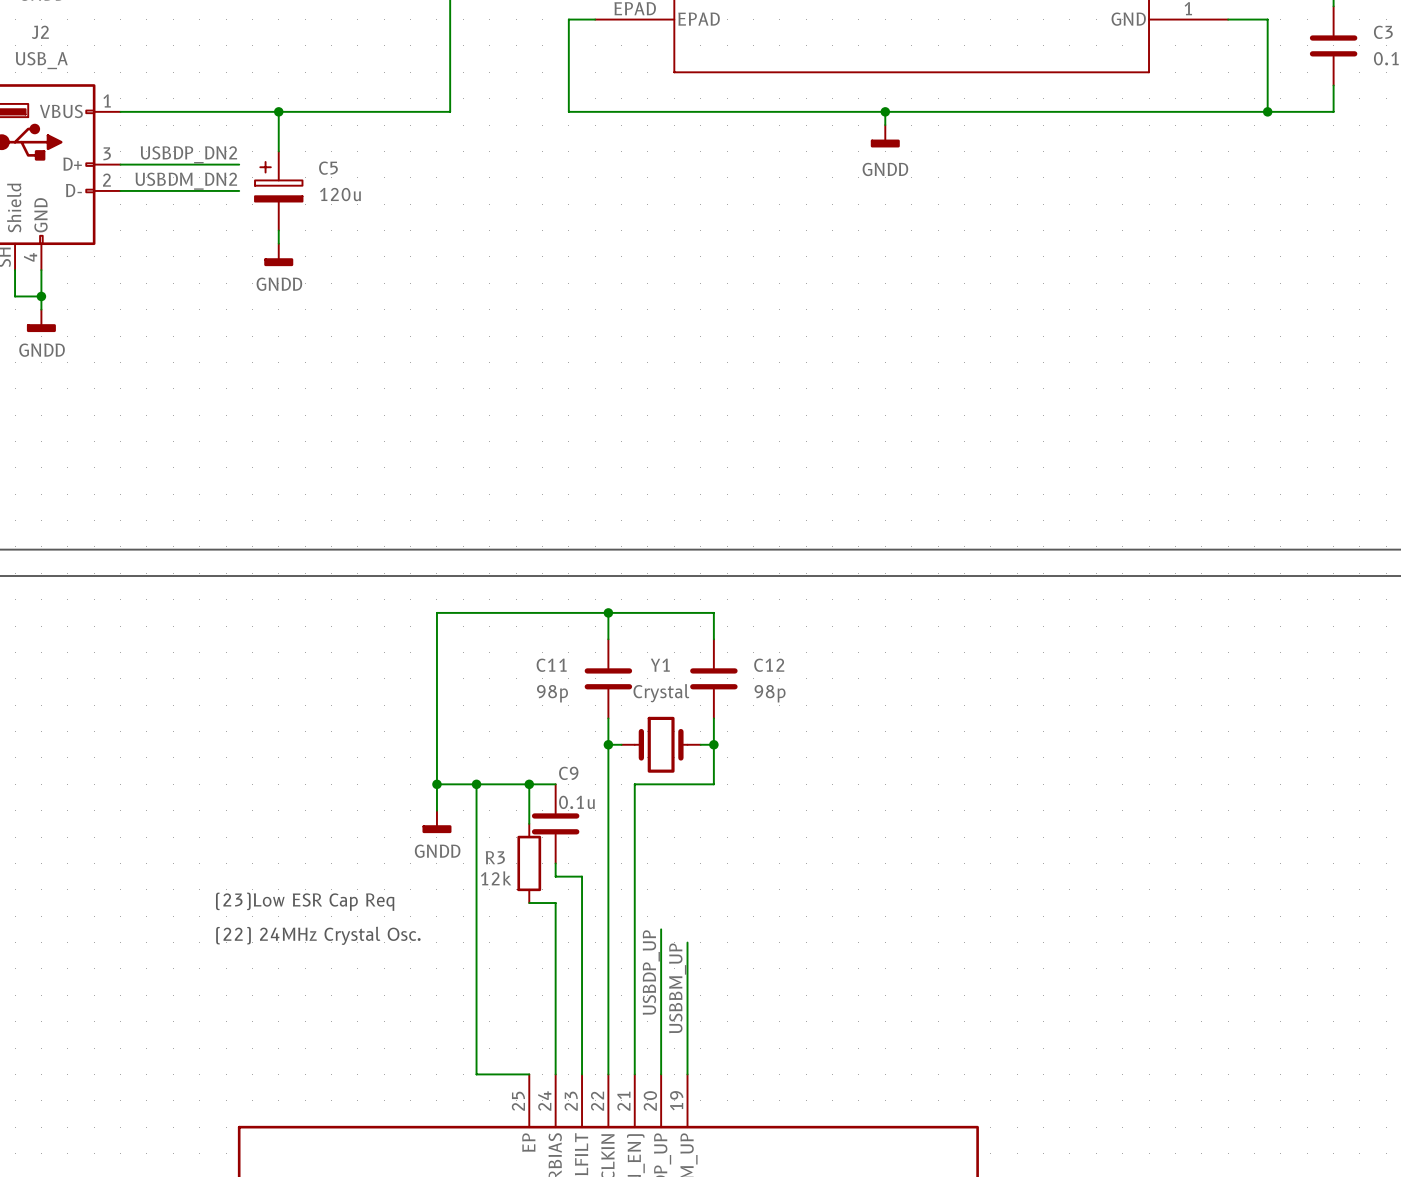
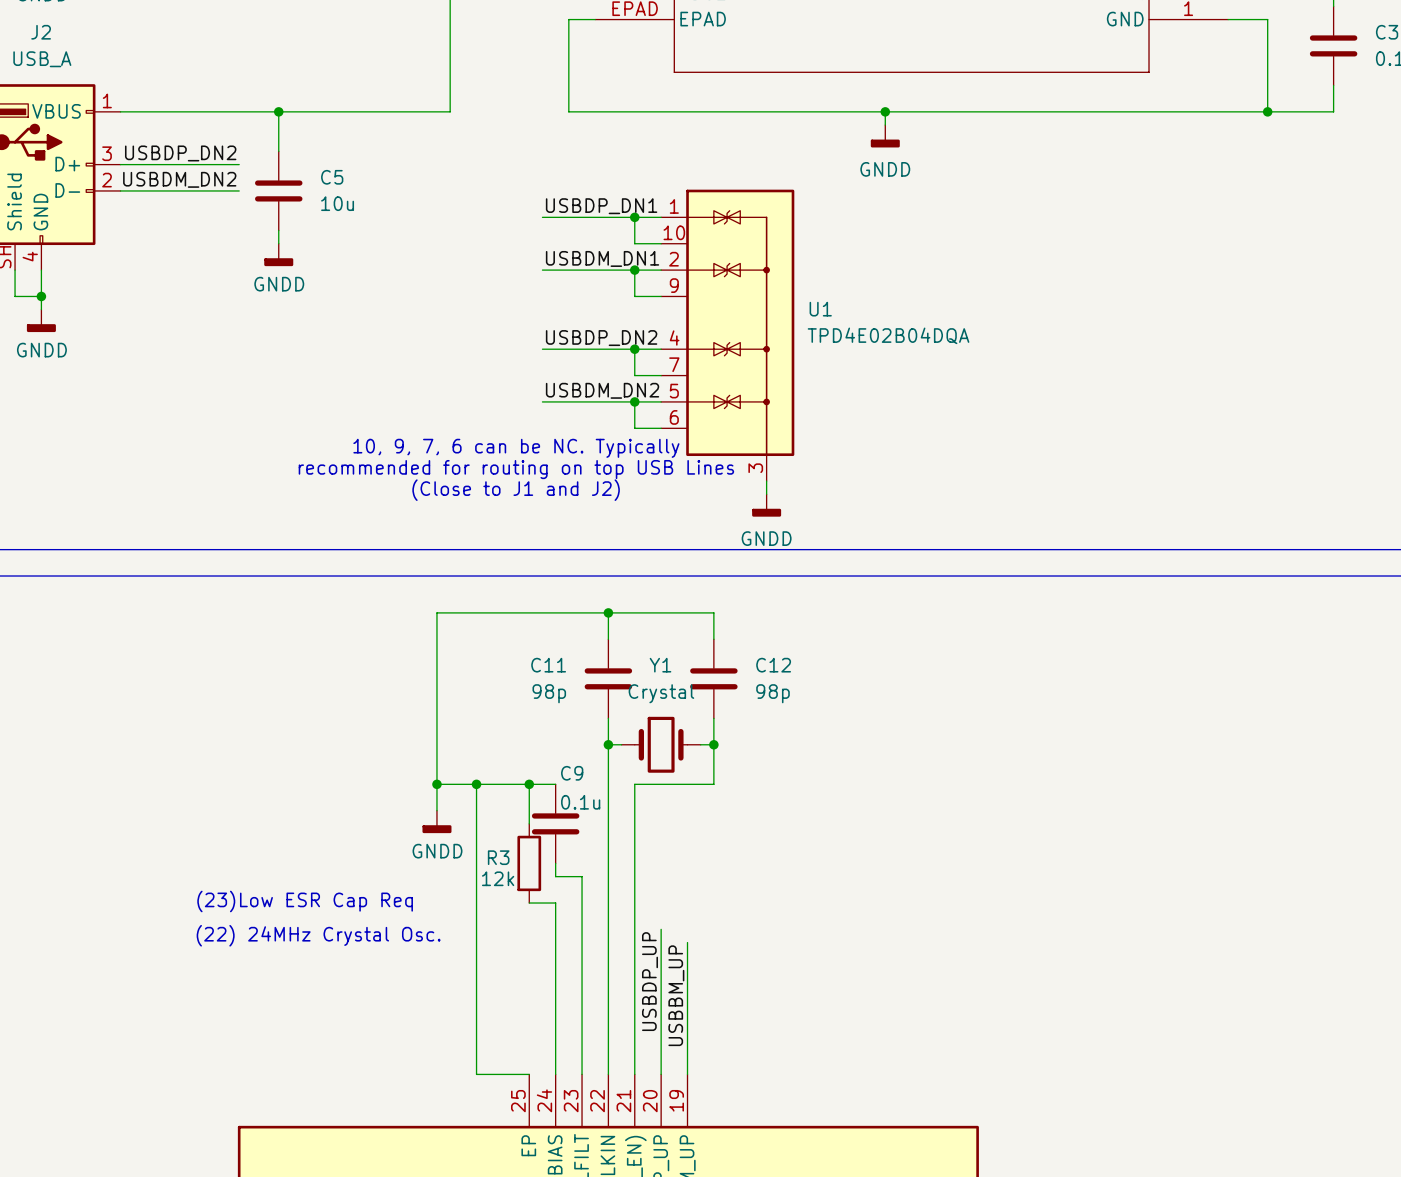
C5 symbol: [255, 151, 303, 231] -> [255, 151, 303, 231]
C5 value: 120u (340, 194) -> 10u (337, 203)
label: none -> USBDP_DN1 (601, 206)
wire: none -> (542, 217) (661, 217)
wire: none -> (634, 217) (634, 243) (661, 243)
junction: none -> (634, 217)
label: none -> USBDM_DN1 (602, 258)
wire: none -> (542, 270) (661, 270)
wire: none -> (634, 270) (634, 296) (661, 296)
junction: none -> (634, 270)
U1: none -> TPD4E02B04DQA (727, 335)
label: none -> USBDP_DN2 (601, 338)
wire: none -> (542, 349) (661, 349)
wire: none -> (634, 349) (634, 375) (661, 375)
junction: none -> (634, 349)
label: none -> USBDM_DN2 (602, 390)
wire: none -> (542, 401) (661, 401)
wire: none -> (634, 401) (634, 428) (661, 428)
junction: none -> (634, 401)
text: none -> 10, 9, 7, 6 can be NC. Typically (516, 448)
text: none -> recommended for routing on top USB Lines (516, 469)
wire: none -> (766, 481) (766, 494)
text: none -> (Close to J1 and J2) (516, 490)
power symbol: none -> GNDD (766, 505)

